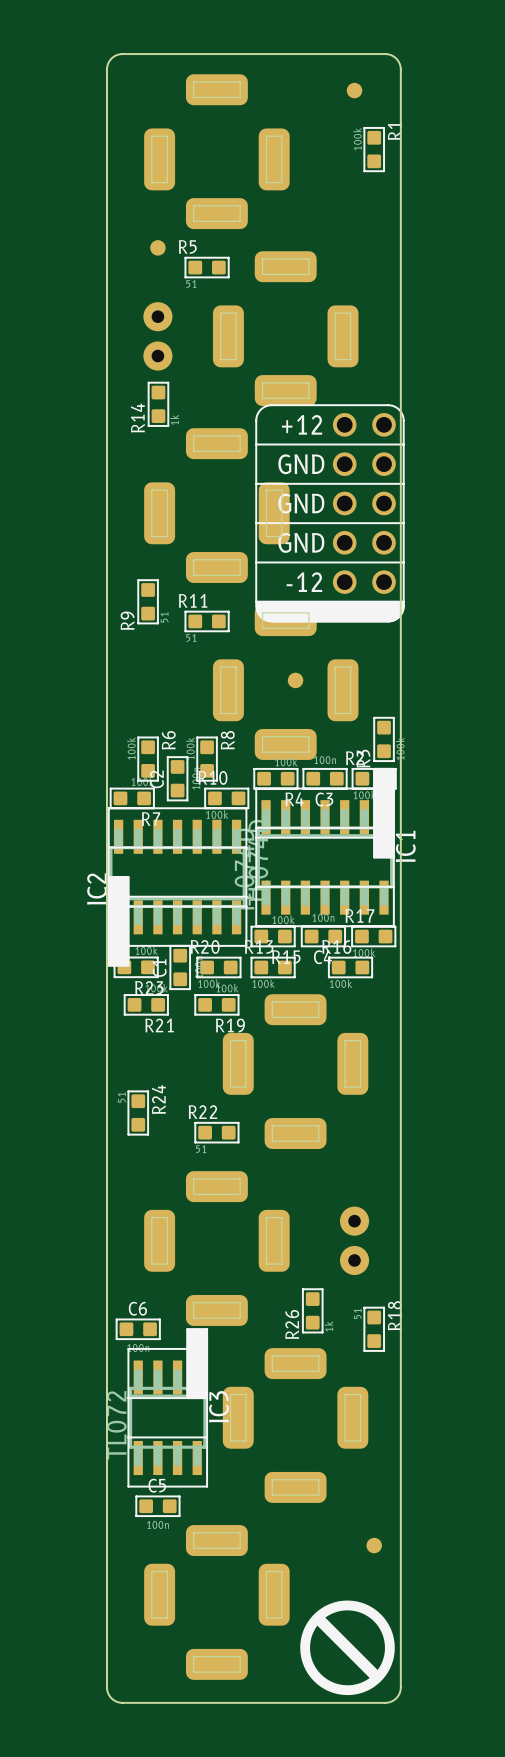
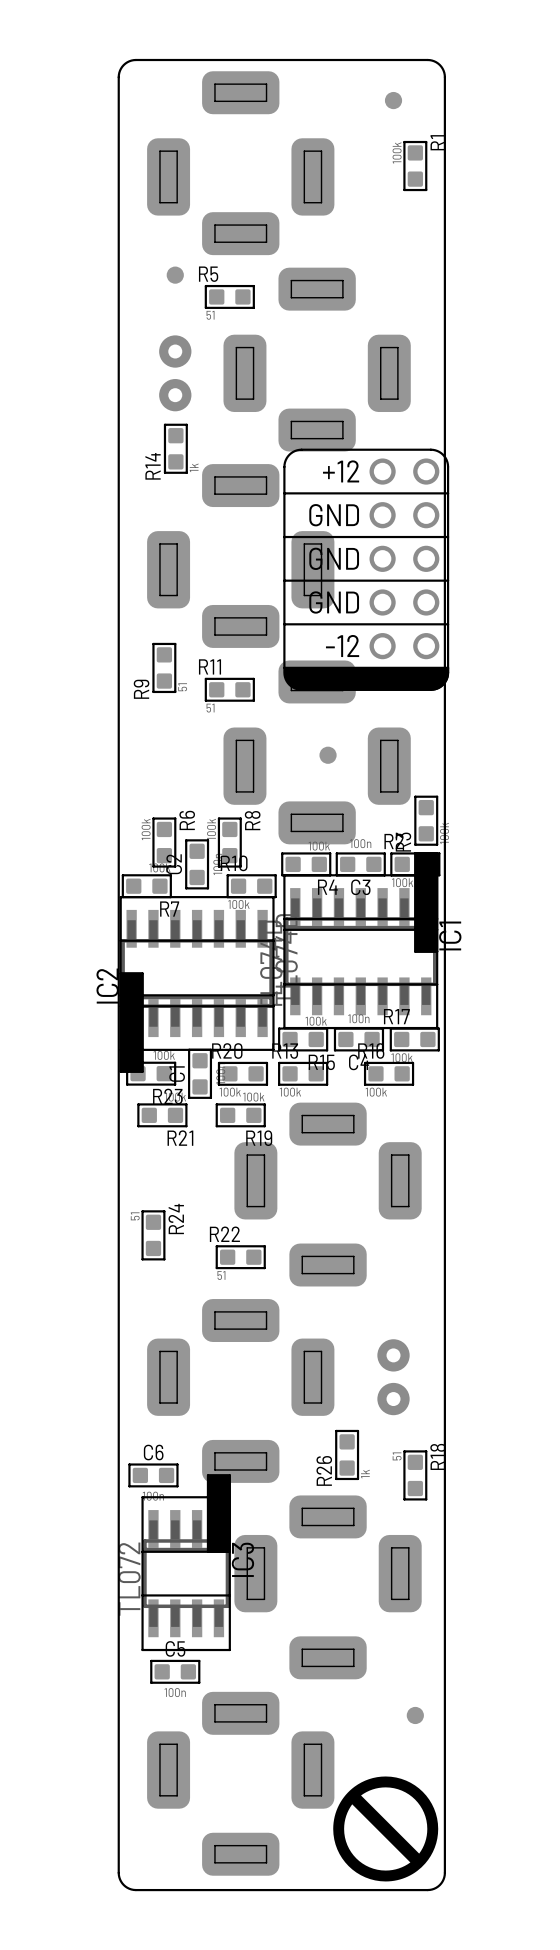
part footprint: [144, 74, 290, 230] -> [147, 71, 335, 256]
part footprint: [212, 251, 359, 407] -> [223, 267, 411, 452]
part footprint: [144, 428, 290, 583] -> [147, 464, 335, 648]
part footprint: [212, 605, 359, 760] -> [223, 660, 411, 845]
part footprint: [222, 994, 369, 1150] -> [234, 1102, 422, 1287]
part footprint: [144, 1171, 290, 1326] -> [147, 1299, 335, 1483]
part footprint: [222, 1348, 369, 1503] -> [234, 1495, 422, 1680]
part footprint: [144, 1525, 290, 1680] -> [147, 1691, 335, 1876]

